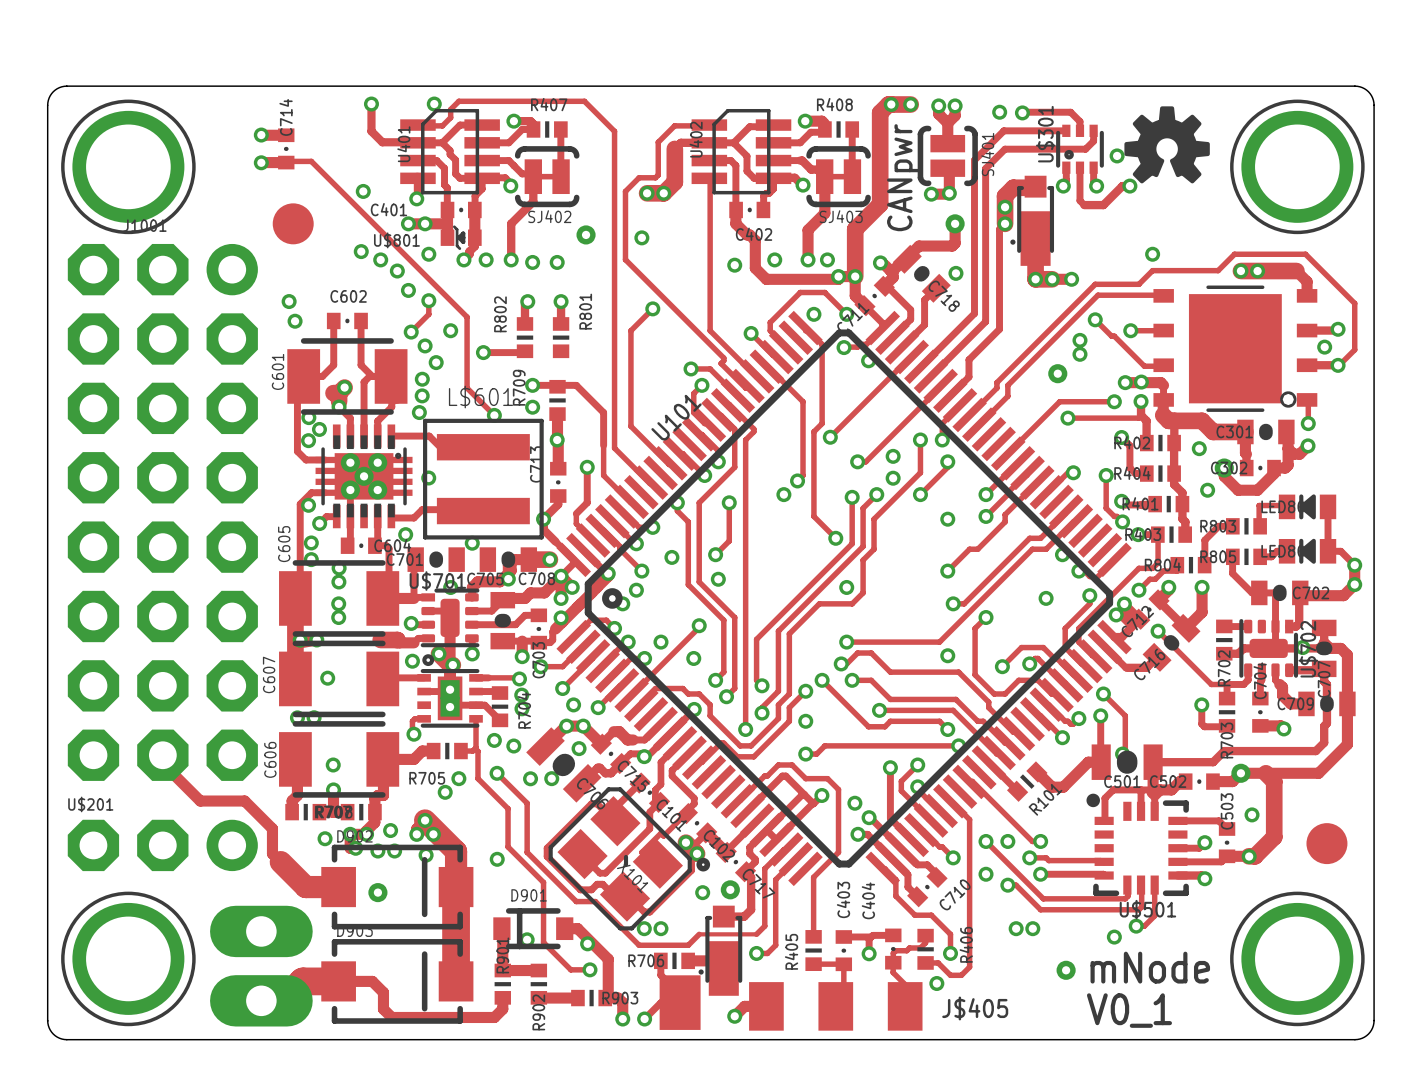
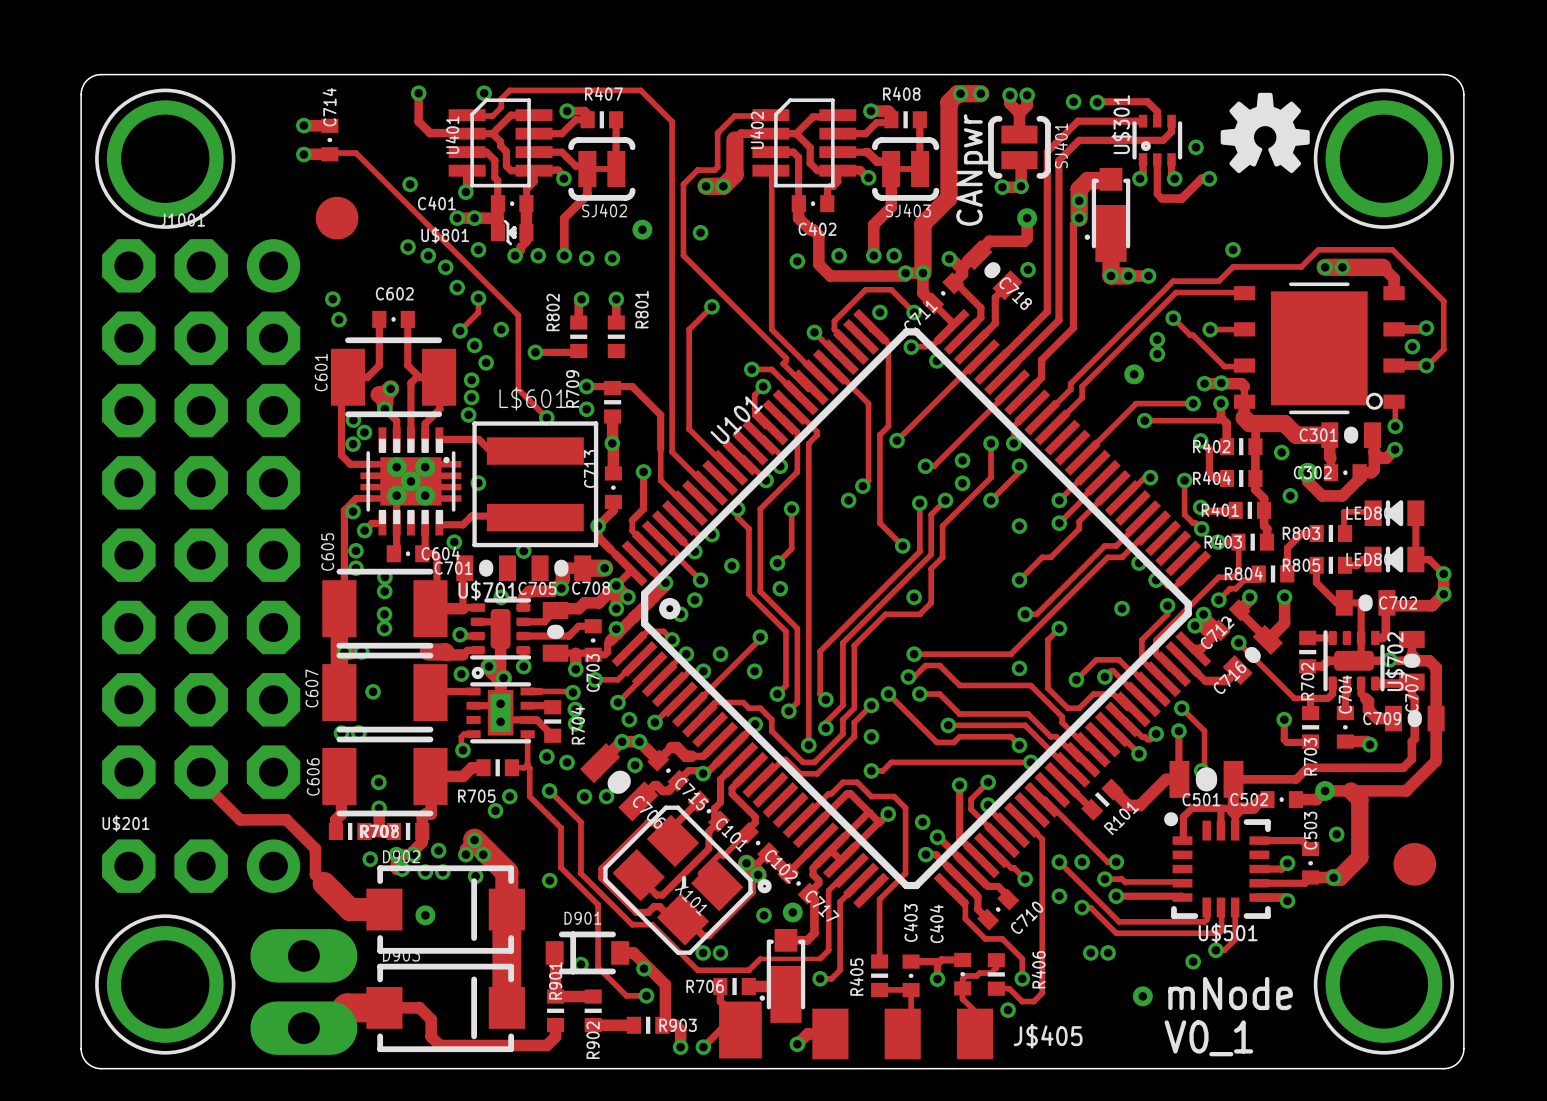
drawing position: (1167, 144) -> (1265, 132)

